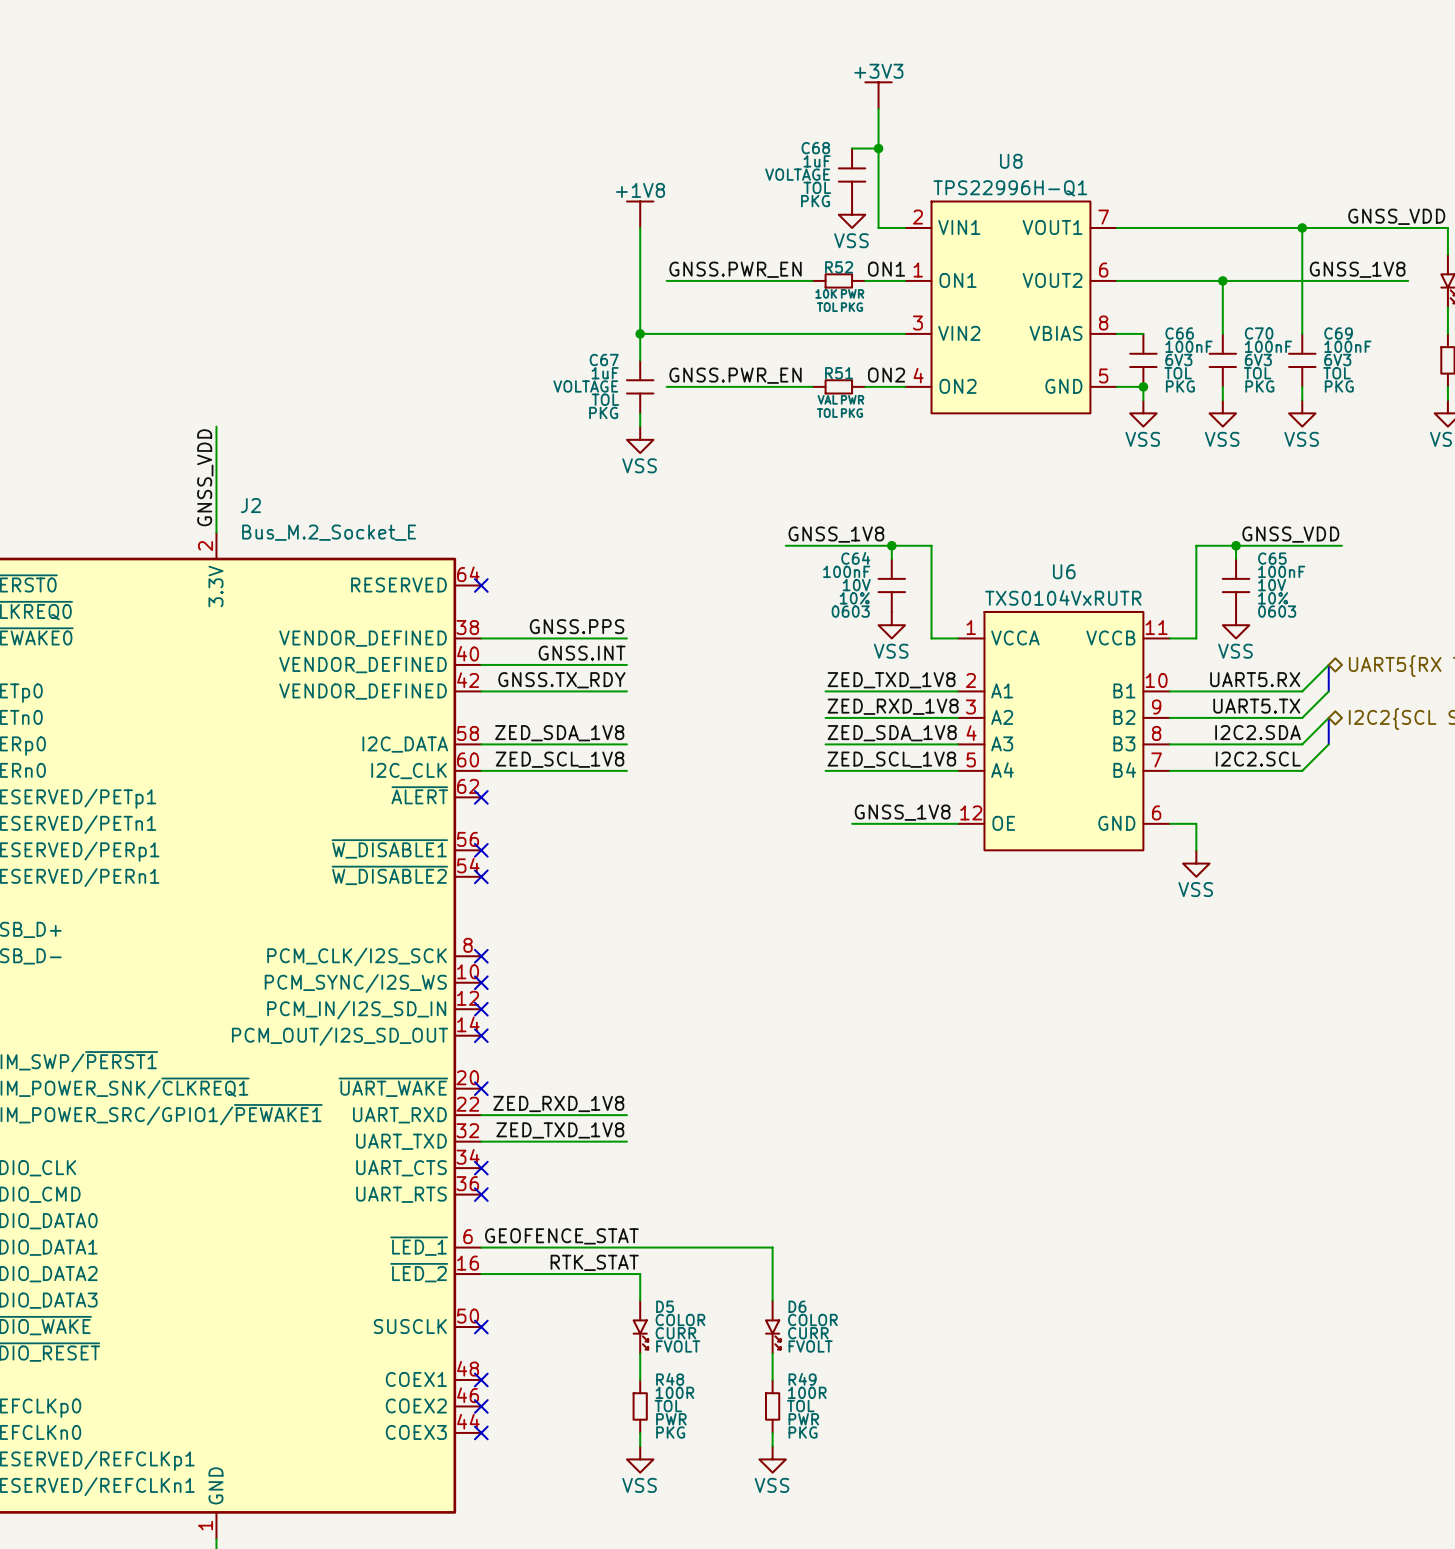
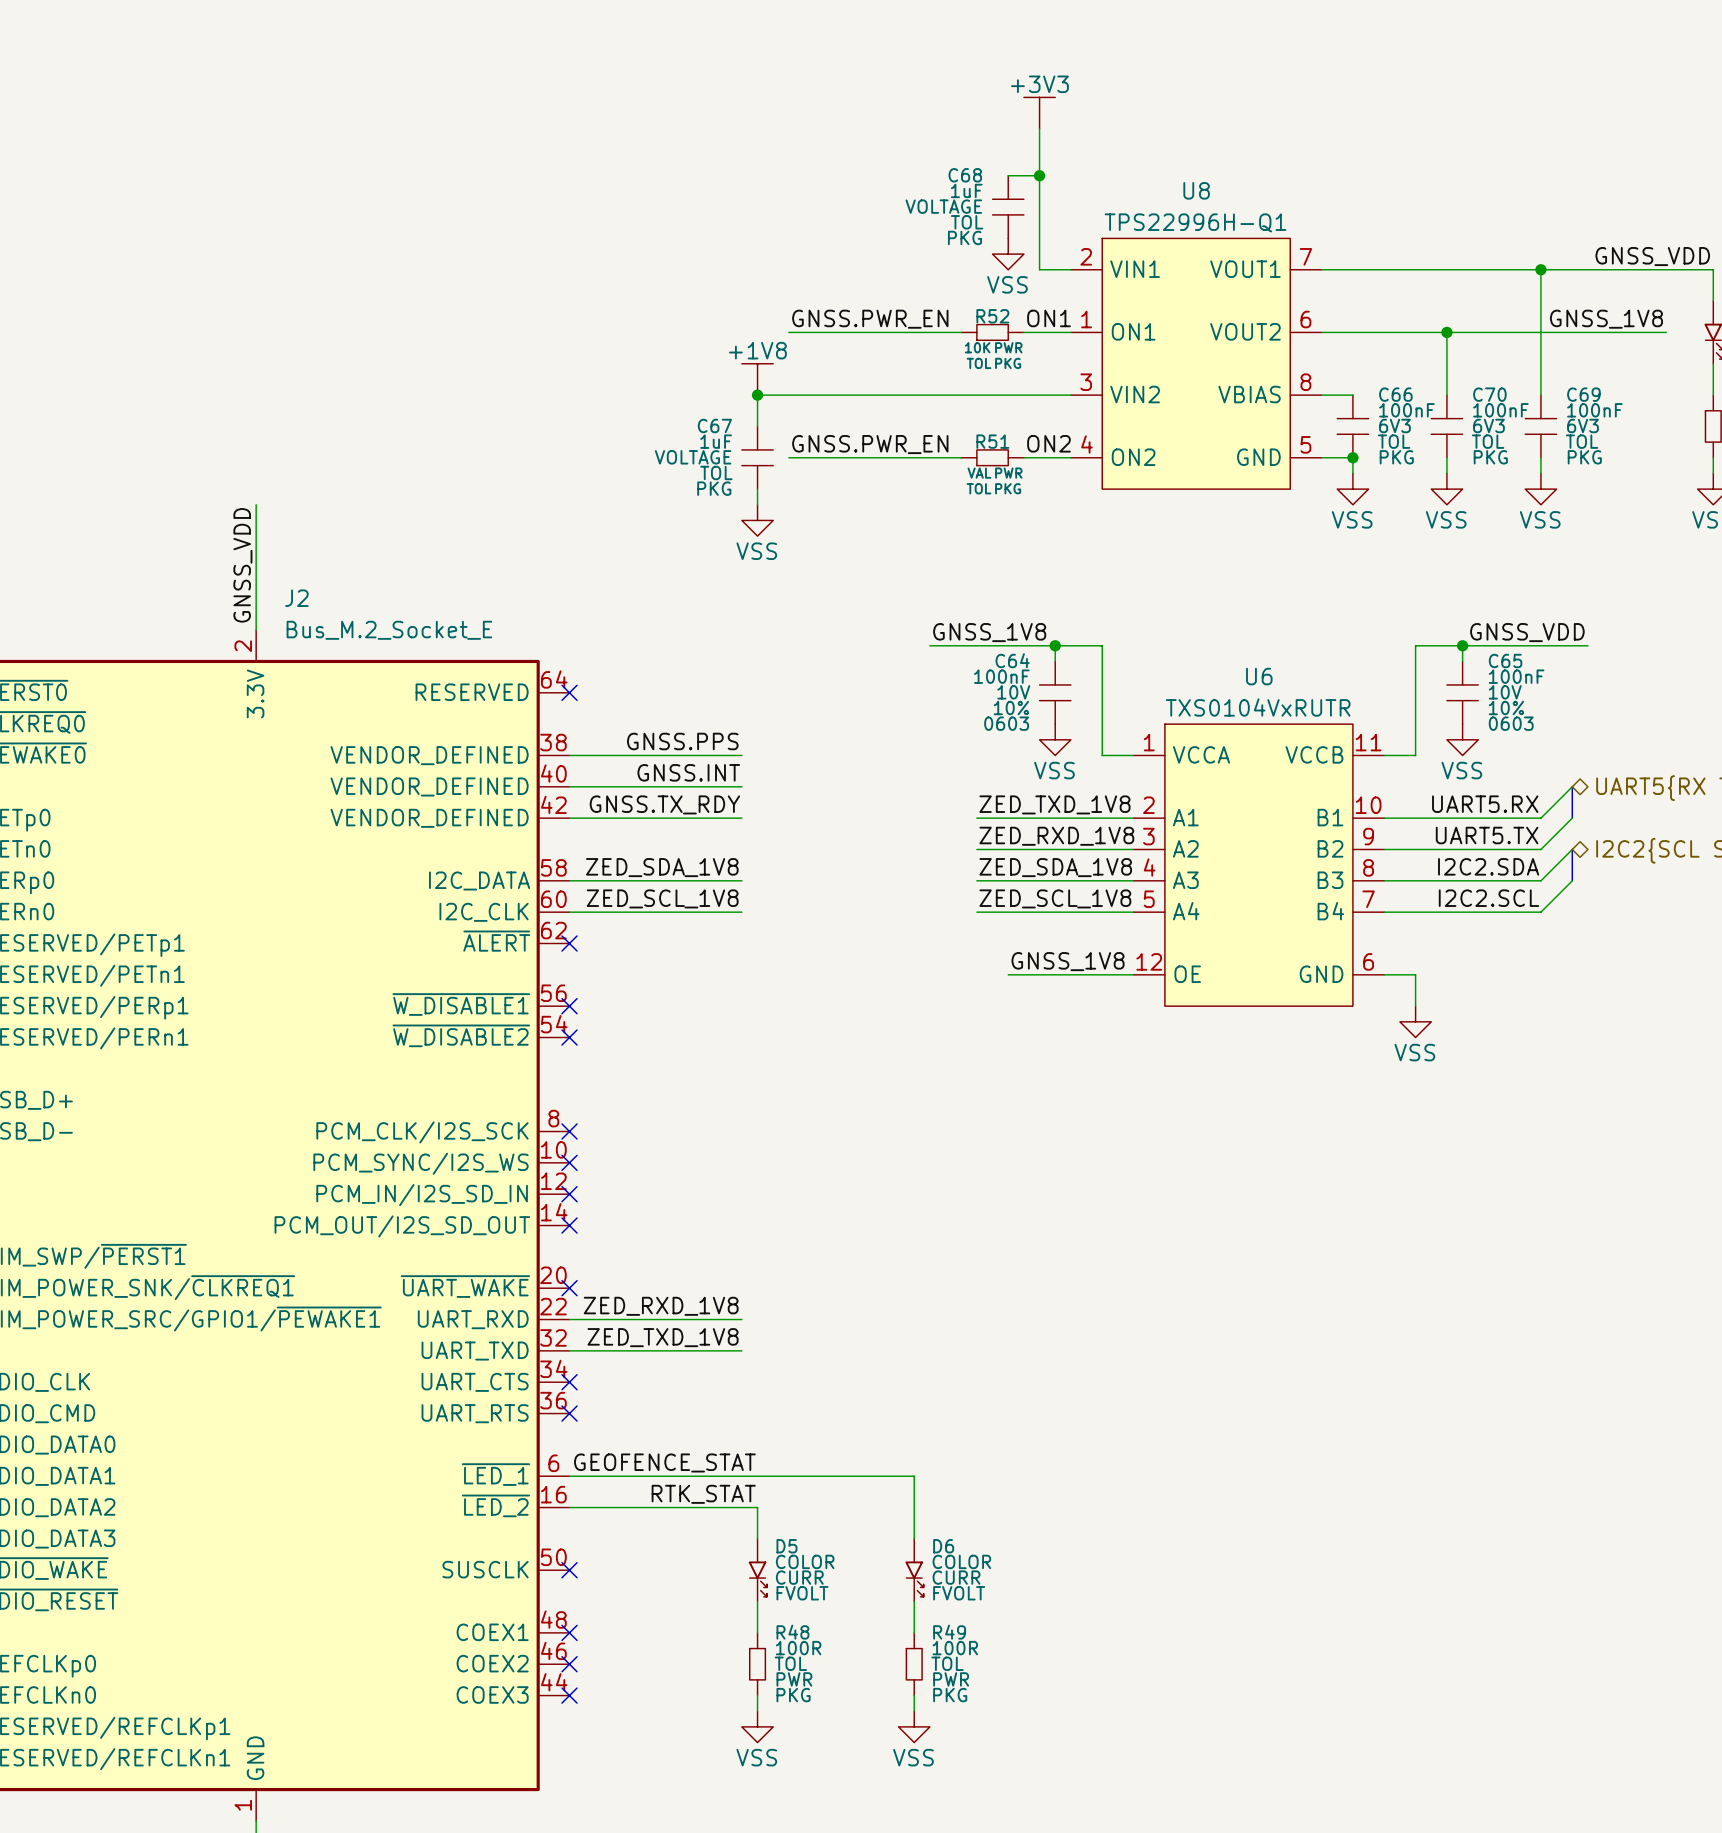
power symbol position: +1V8 (640, 214) -> +1V8 (757, 379)
wire: (640, 227) (640, 333) -> none

